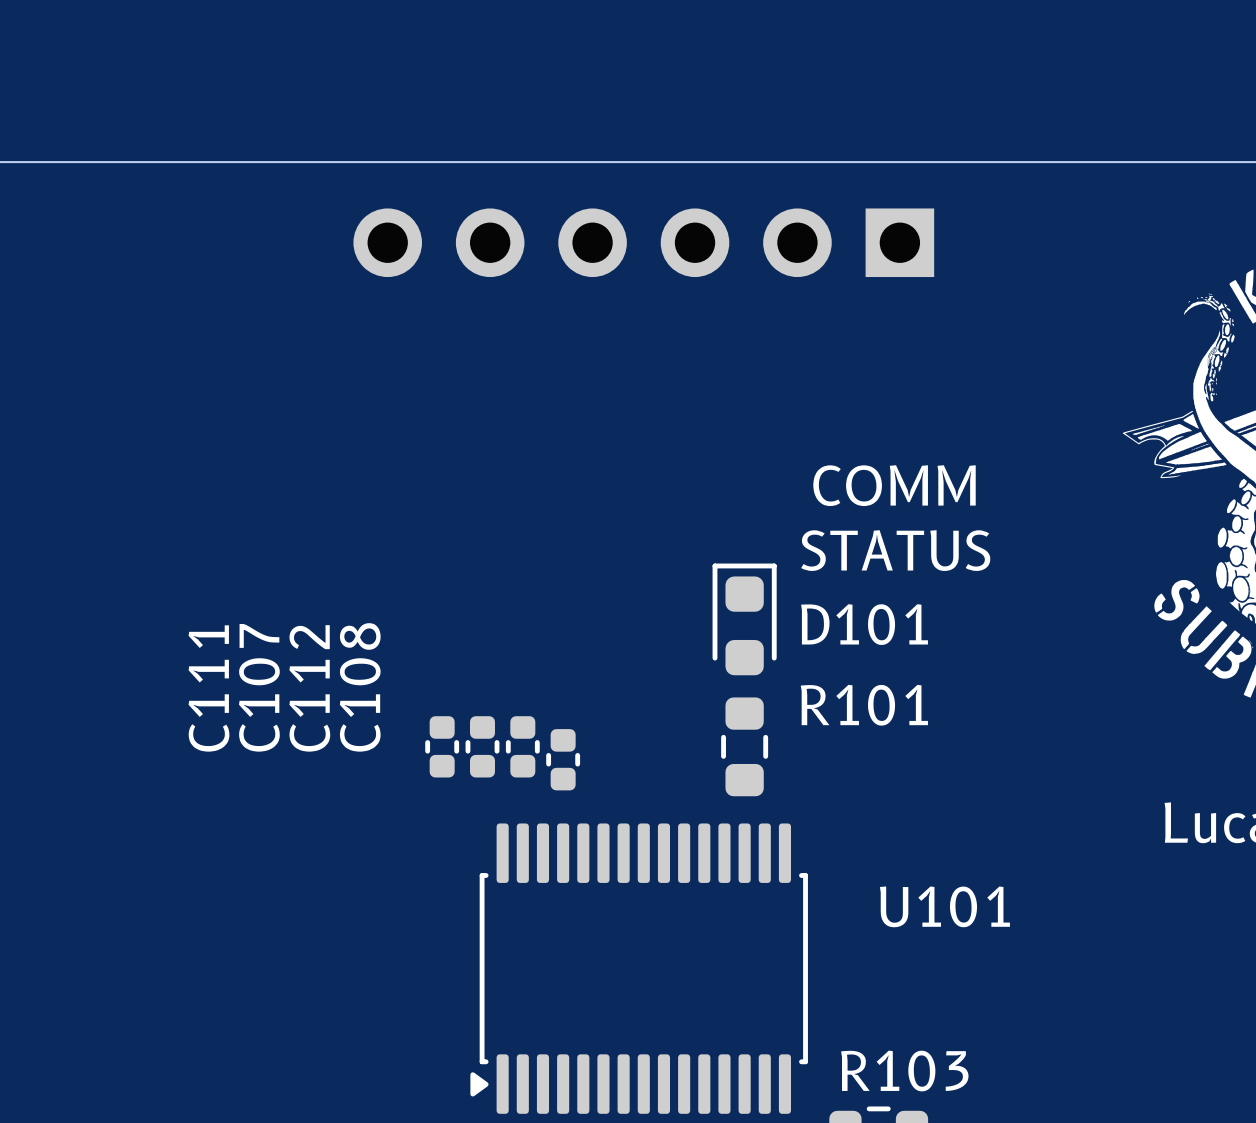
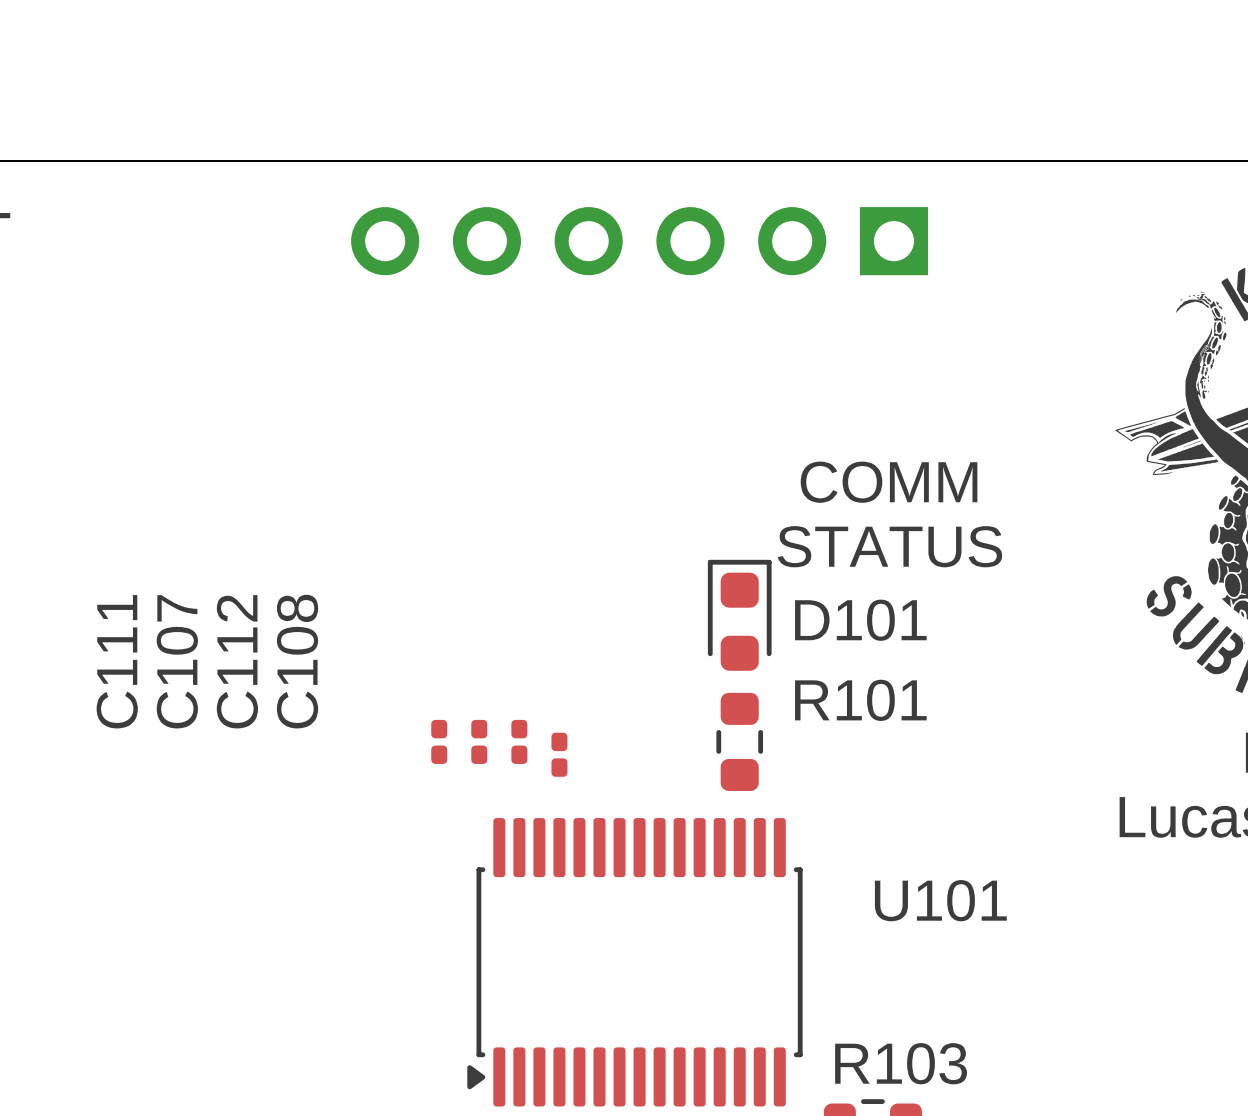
C107 name position: C107 (259, 687) -> C107 (177, 661)
C111 name position: C111 (209, 688) -> C111 (117, 661)
C111 footprint: [425, 716, 460, 778] -> [431, 719, 448, 764]
C107 footprint: [465, 716, 500, 778] -> [471, 719, 488, 764]
C112 footprint: [505, 716, 540, 778] -> [511, 719, 528, 764]
C108 footprint: [546, 729, 581, 791] -> [551, 732, 568, 777]

